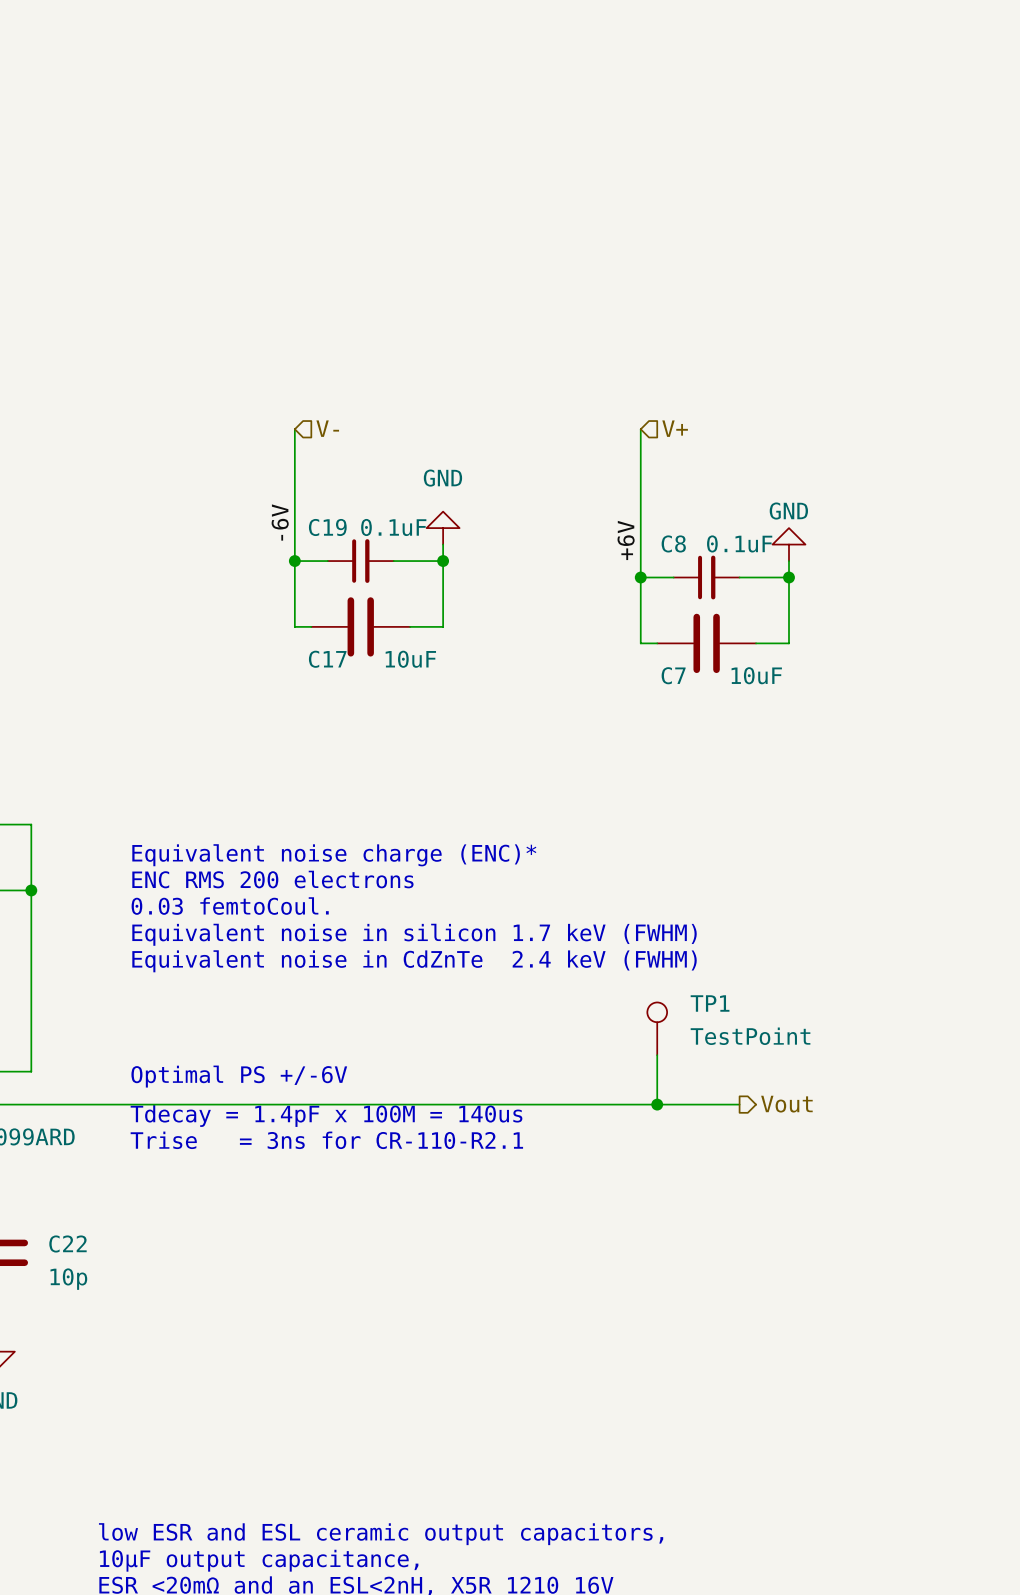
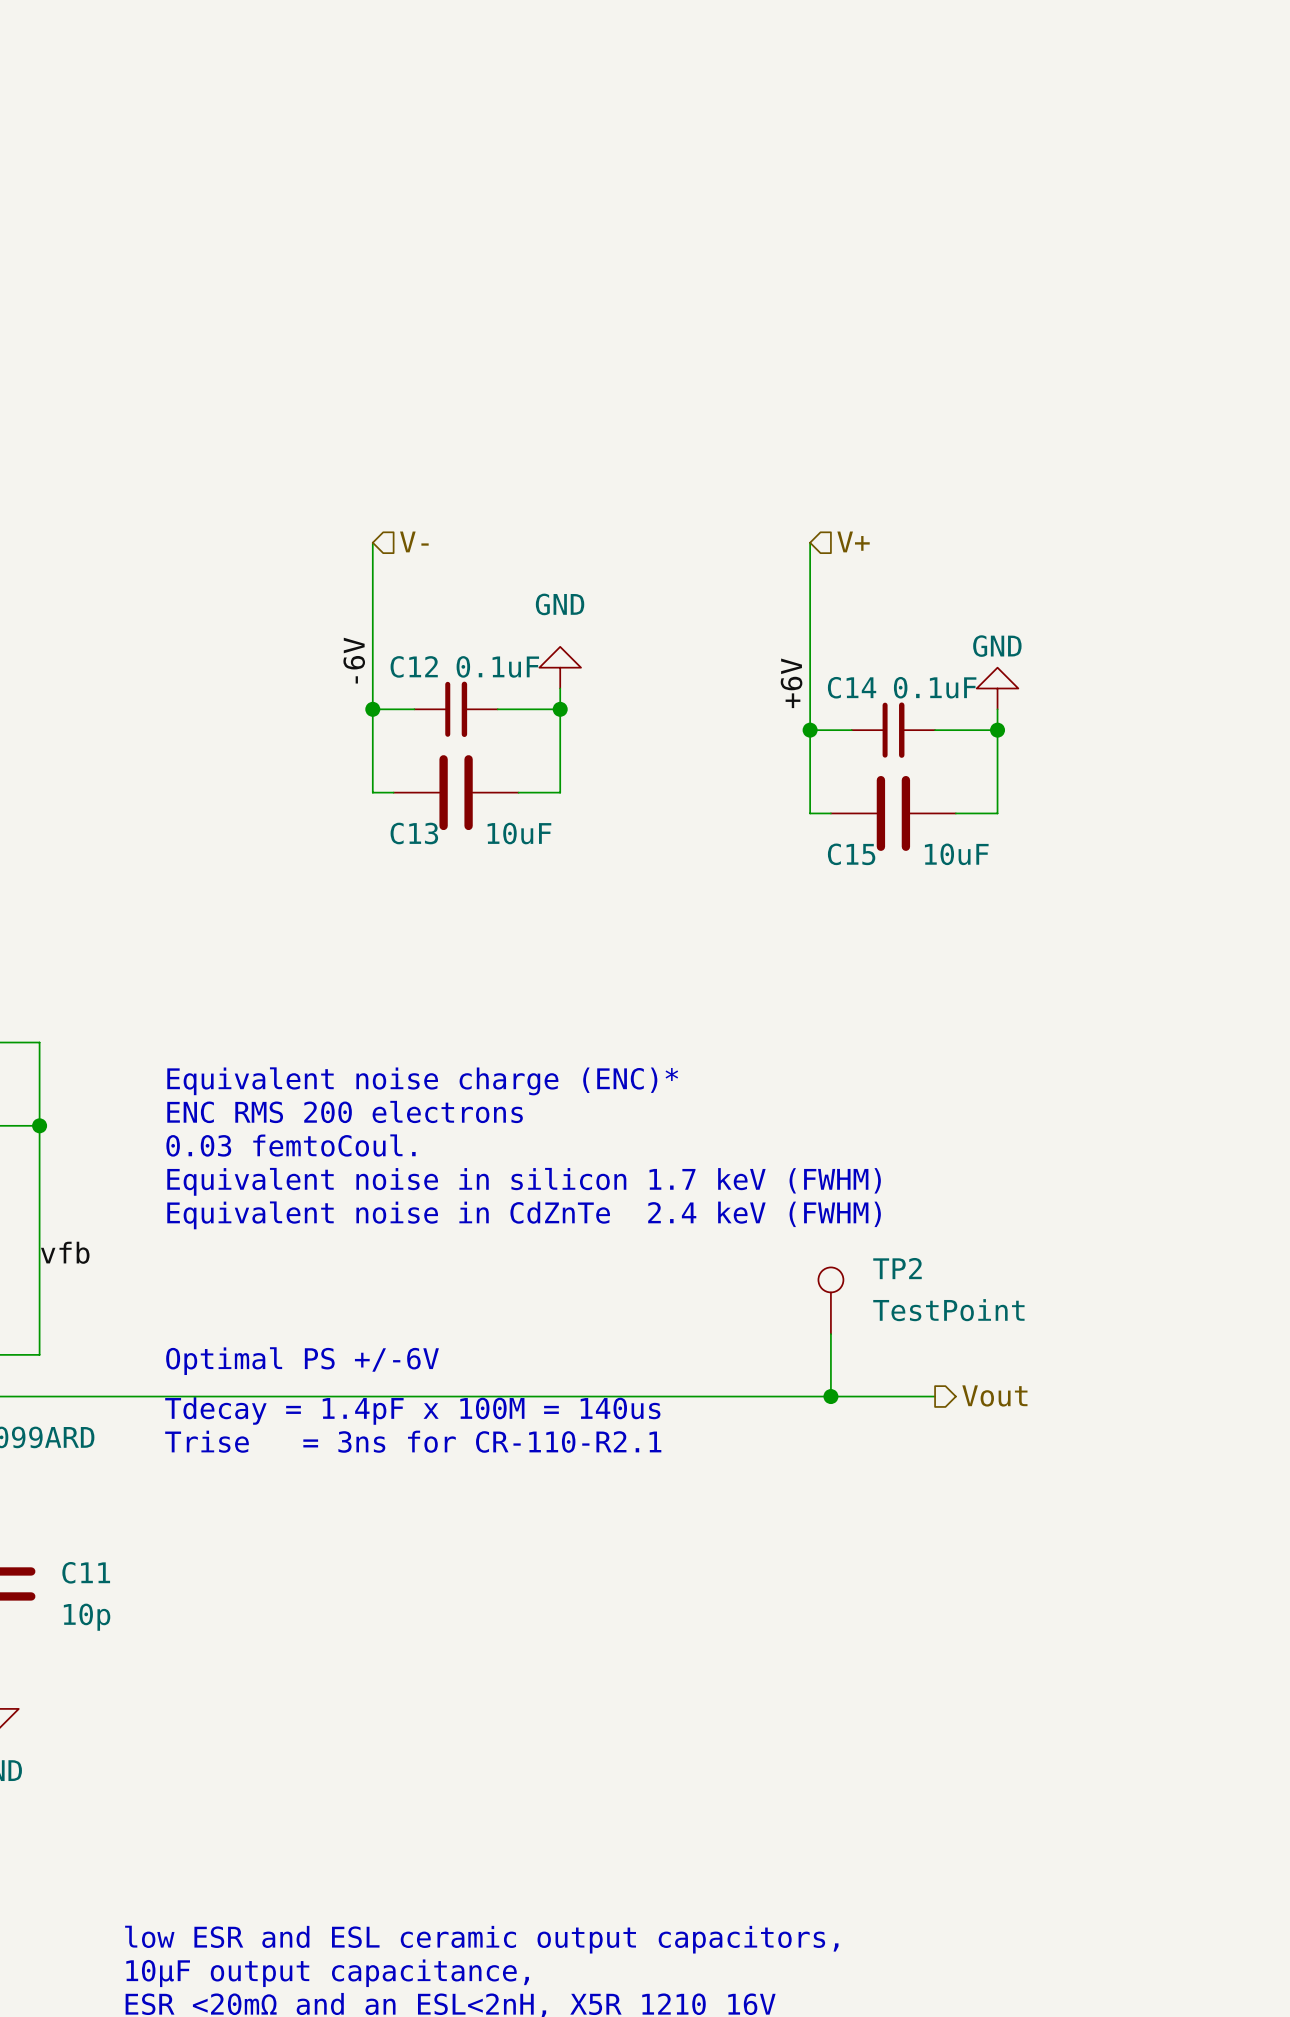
C19 name: C19 (327, 527) -> C12 (414, 666)
C8 name: C8 (673, 543) -> C14 (852, 687)
C17 name: C17 (327, 659) -> C13 (414, 833)
C7 name: C7 (673, 675) -> C15 (851, 854)
label: none -> vfb (65, 1252)
TP1 name: TP1 (710, 1003) -> TP2 (897, 1268)
C22 name: C22 (67, 1243) -> C11 (86, 1572)

